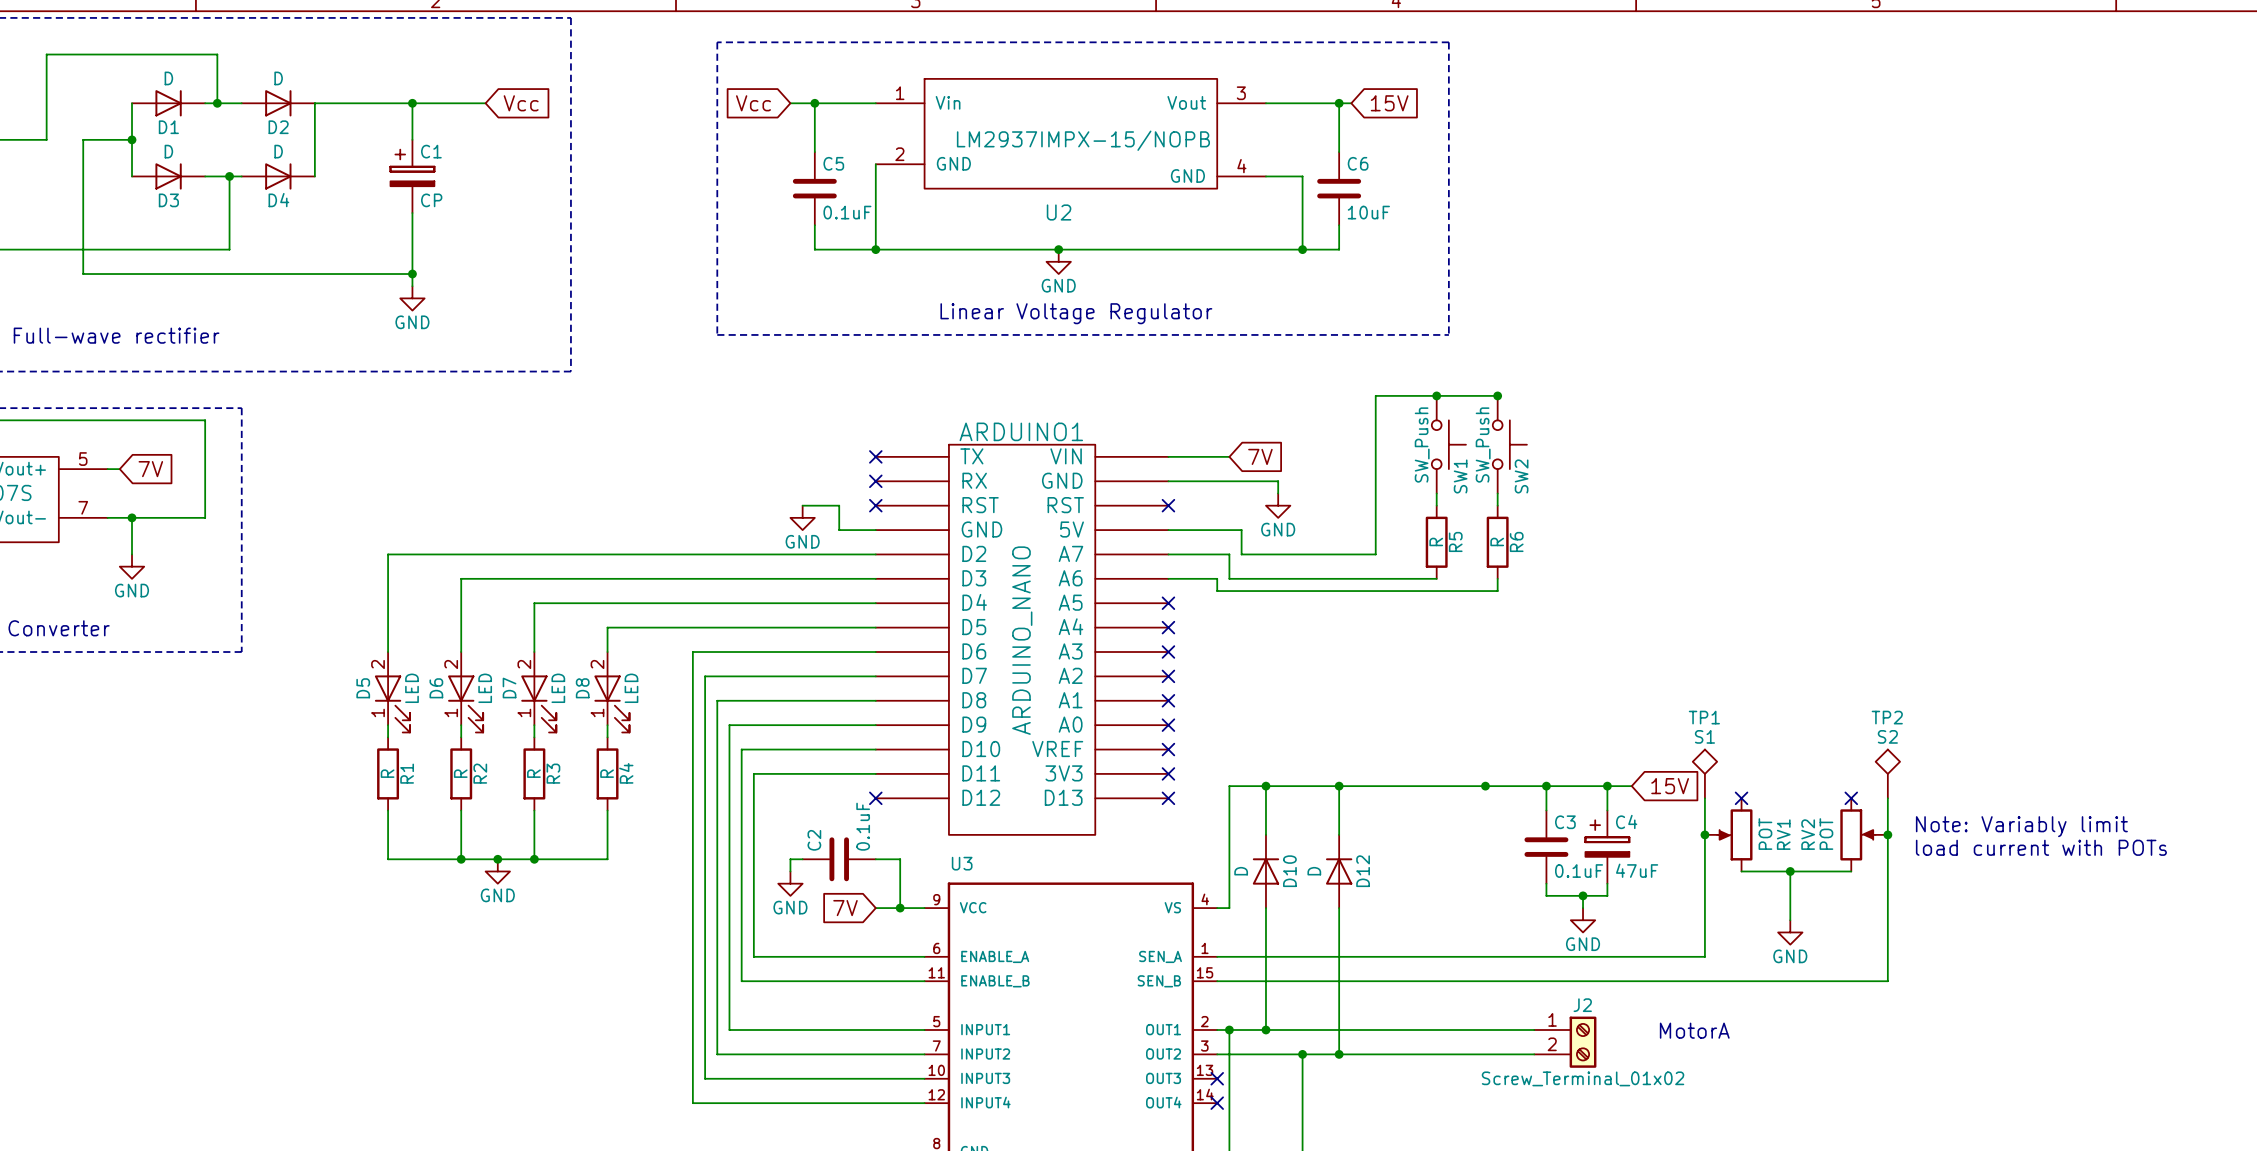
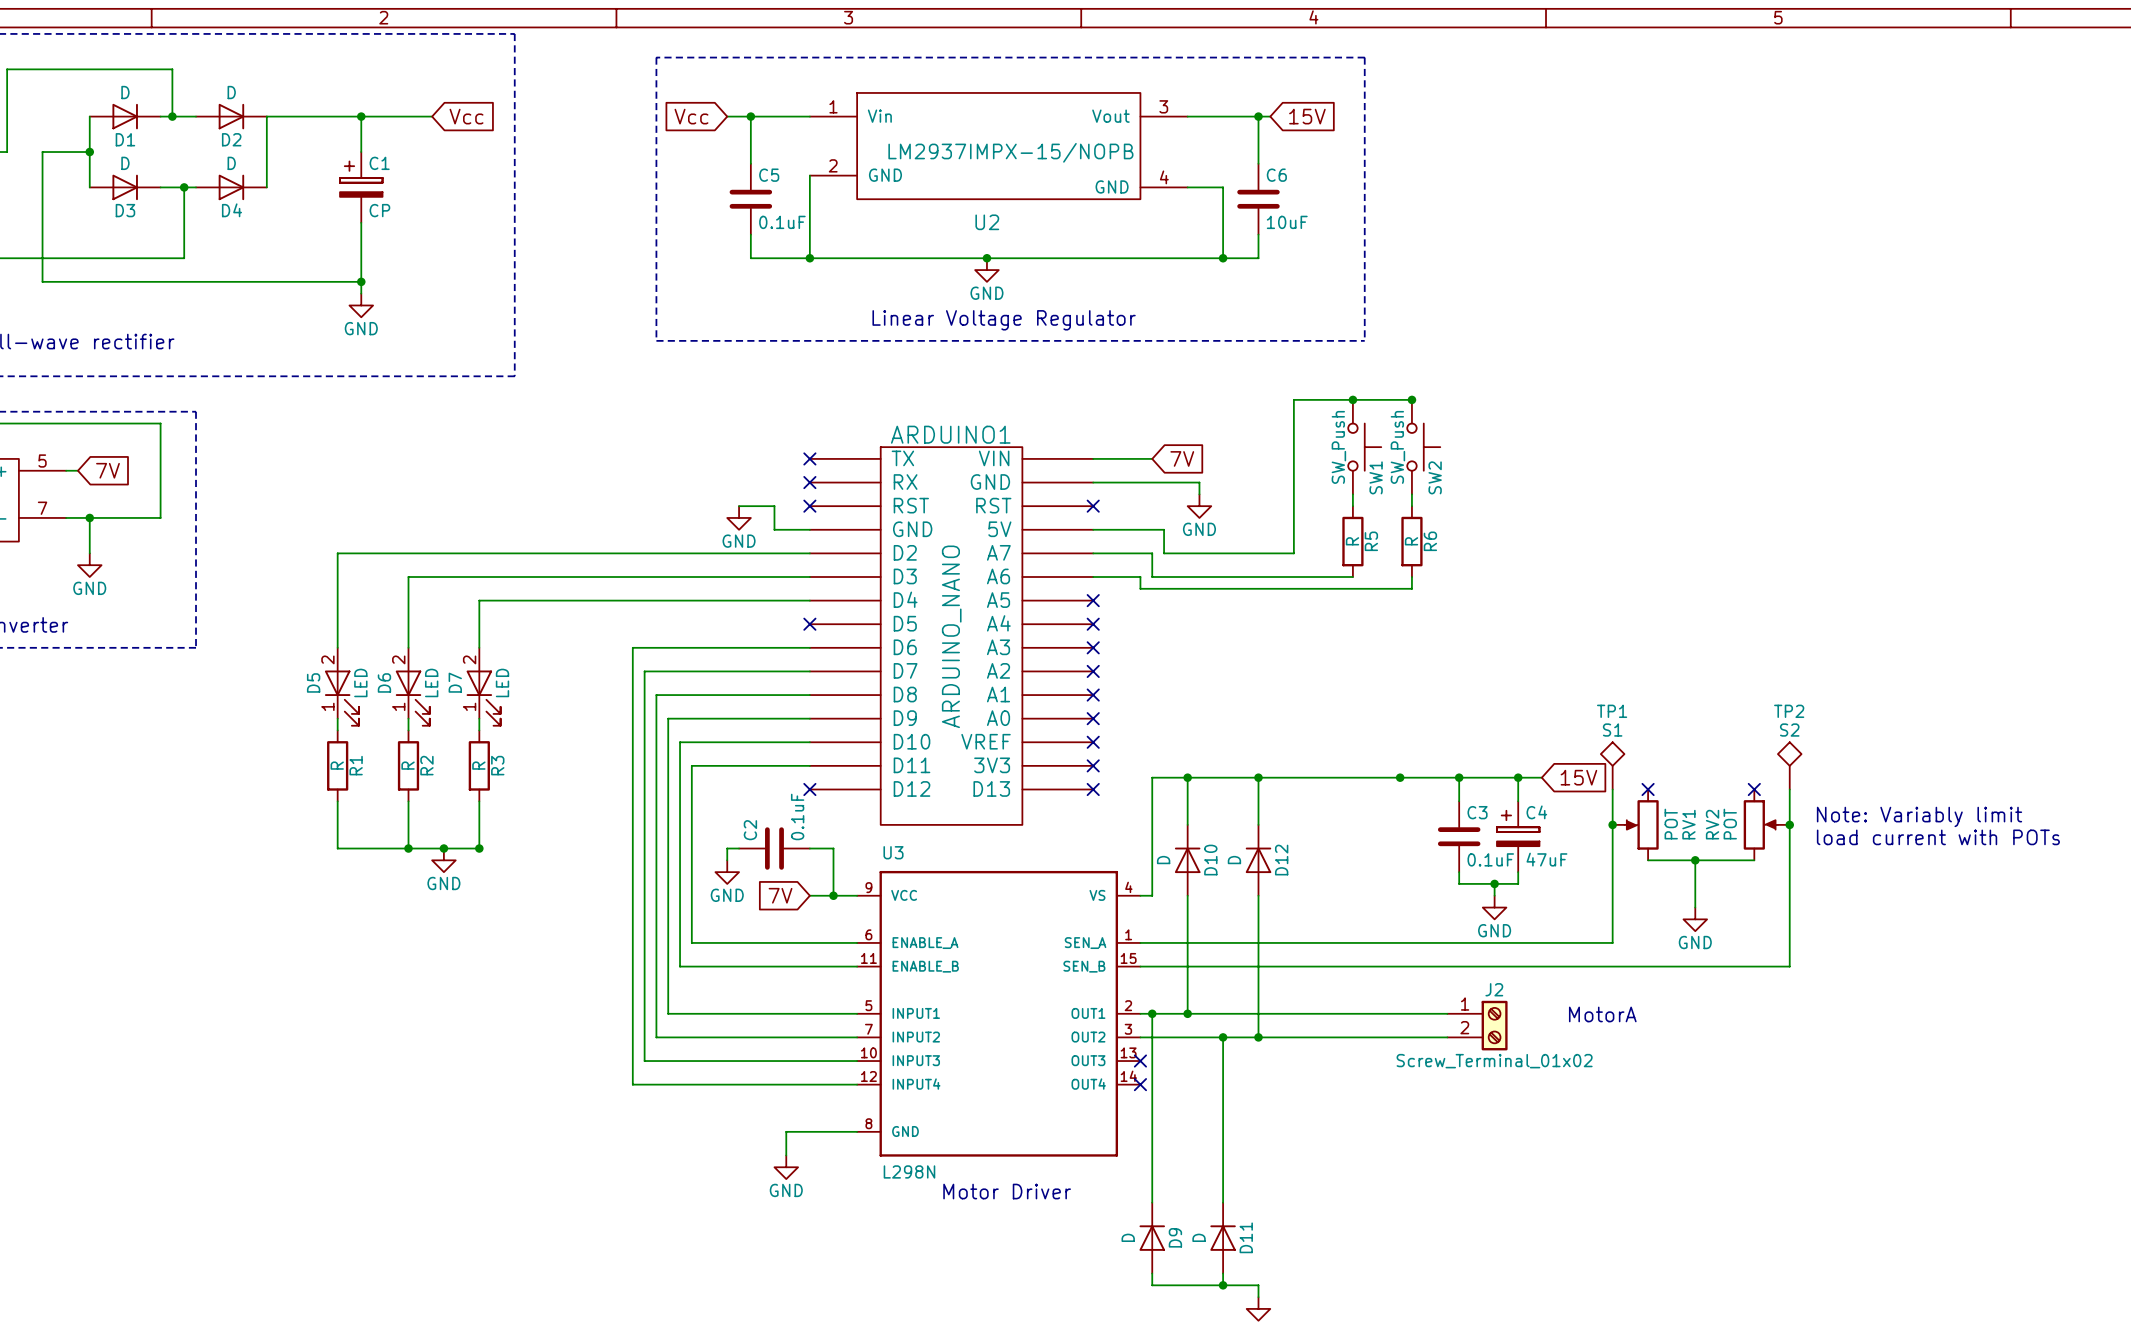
wire: (875, 627) (607, 627) (607, 652) -> none
no-connect mark: none -> (809, 624)
D8: LED (611, 692) -> none
wire: (607, 725) (607, 737) -> none
R4: R (607, 773) -> none
wire: (607, 810) (607, 859) (534, 859) -> none

